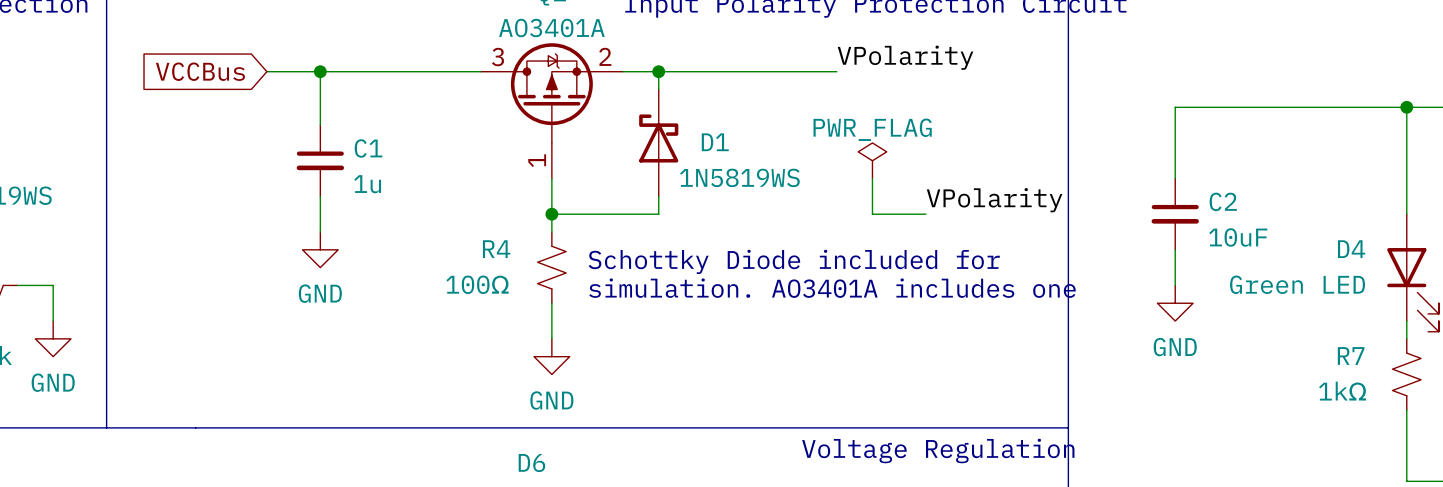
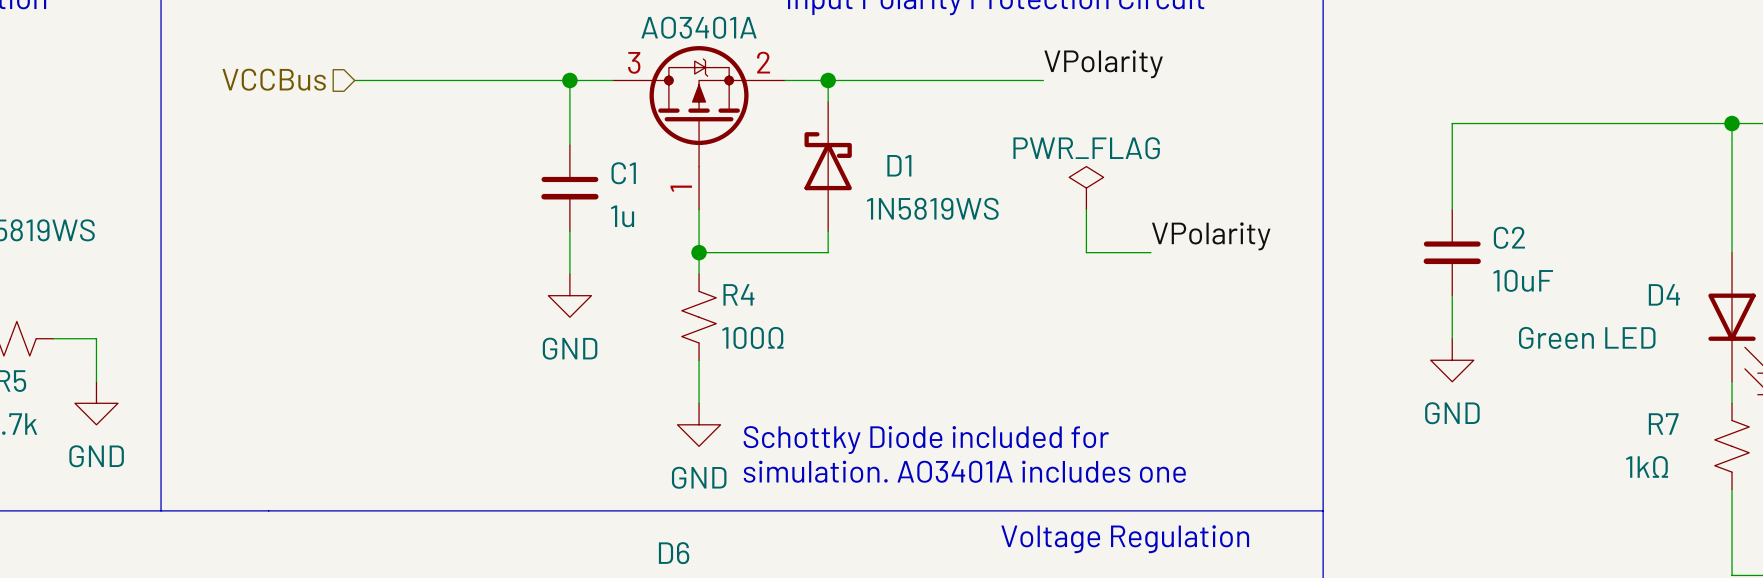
hierarchical label: none -> VCCBus (274, 79)
global label: VCCBus (200, 71) -> none
wire: (320, 71) (320, 125) -> (569, 80) (569, 145)
junction: (320, 71) -> none
junction: none -> (569, 80)
C1 position: (320, 160) -> (569, 188)
wire: (320, 196) (320, 232) -> (569, 231) (569, 274)
power symbol position: GND (320, 249) -> GND (569, 295)
R4 name position: R4 (496, 249) -> R4 (738, 294)
text position: Schottky Diode included for (794, 261) -> Schottky Diode included for (926, 440)
R4 value position: 100Ω (477, 284) -> 100Ω (752, 337)
text position: simulation. AO3401A includes one (832, 288) -> simulation. AO3401A includes one (964, 471)

